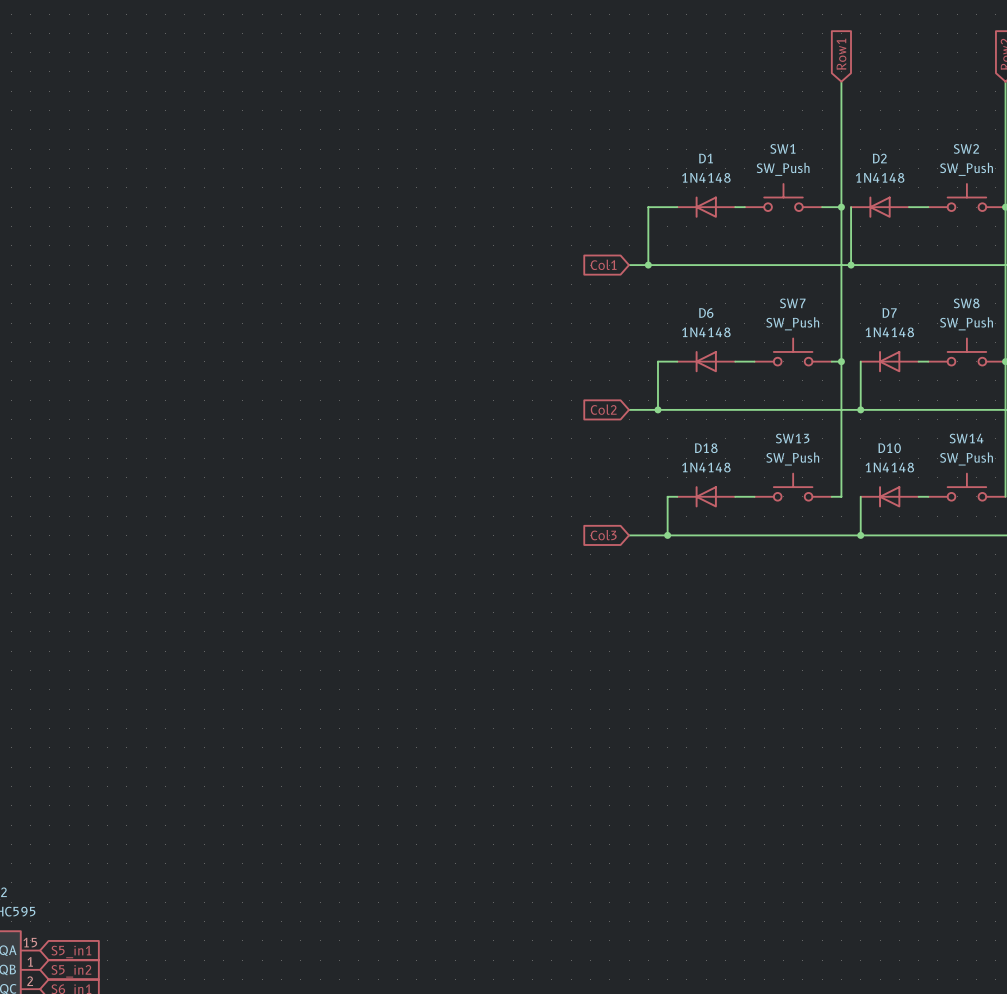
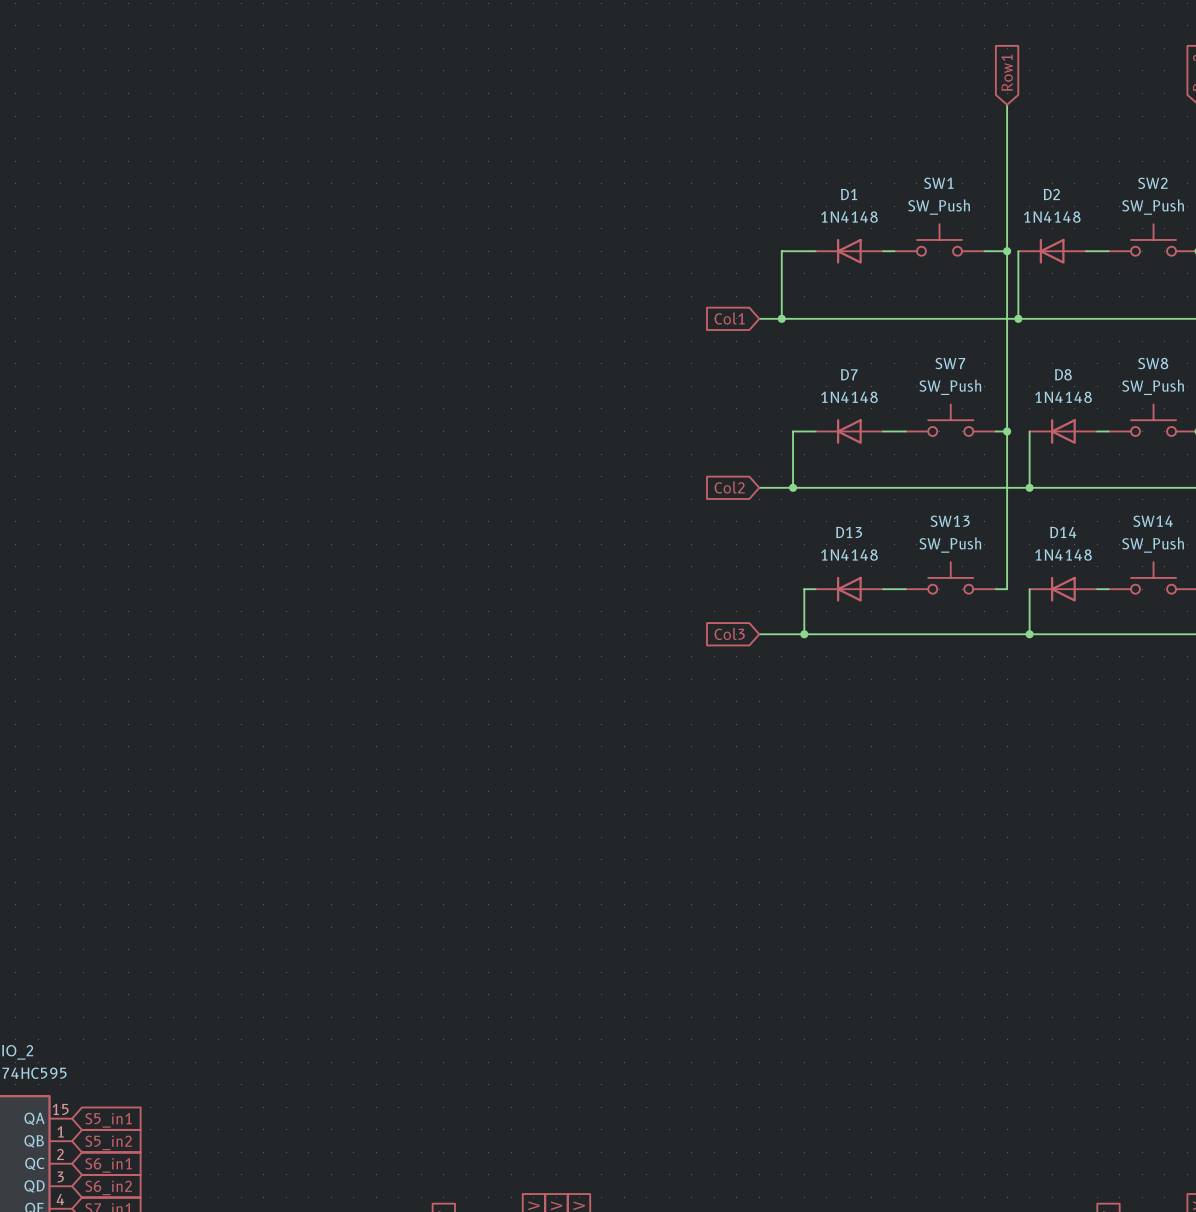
D6 name: D6 (706, 313) -> D7 (849, 374)
D7 name: D7 (889, 313) -> D8 (1063, 374)
D18 name: D18 (706, 448) -> D13 (849, 532)
D10 name: D10 (889, 448) -> D14 (1063, 532)

